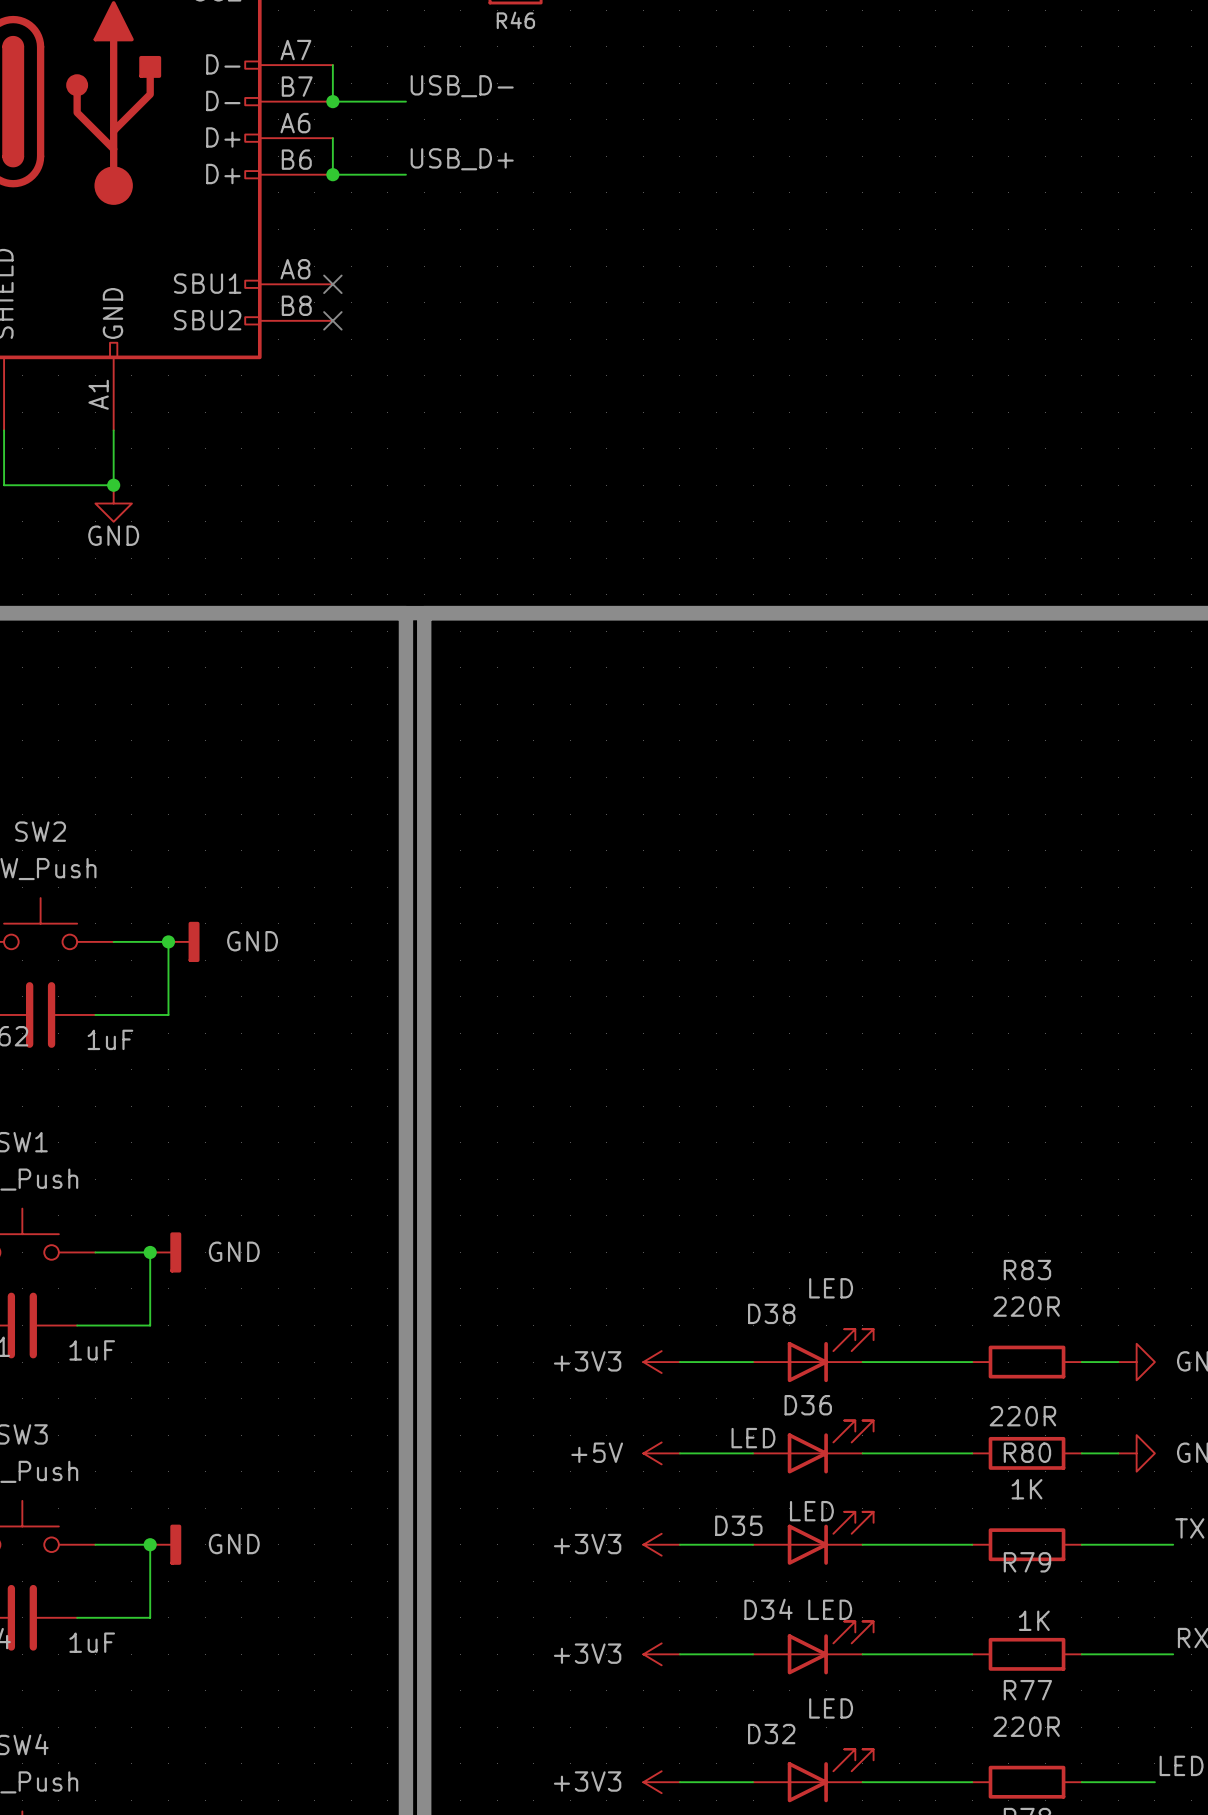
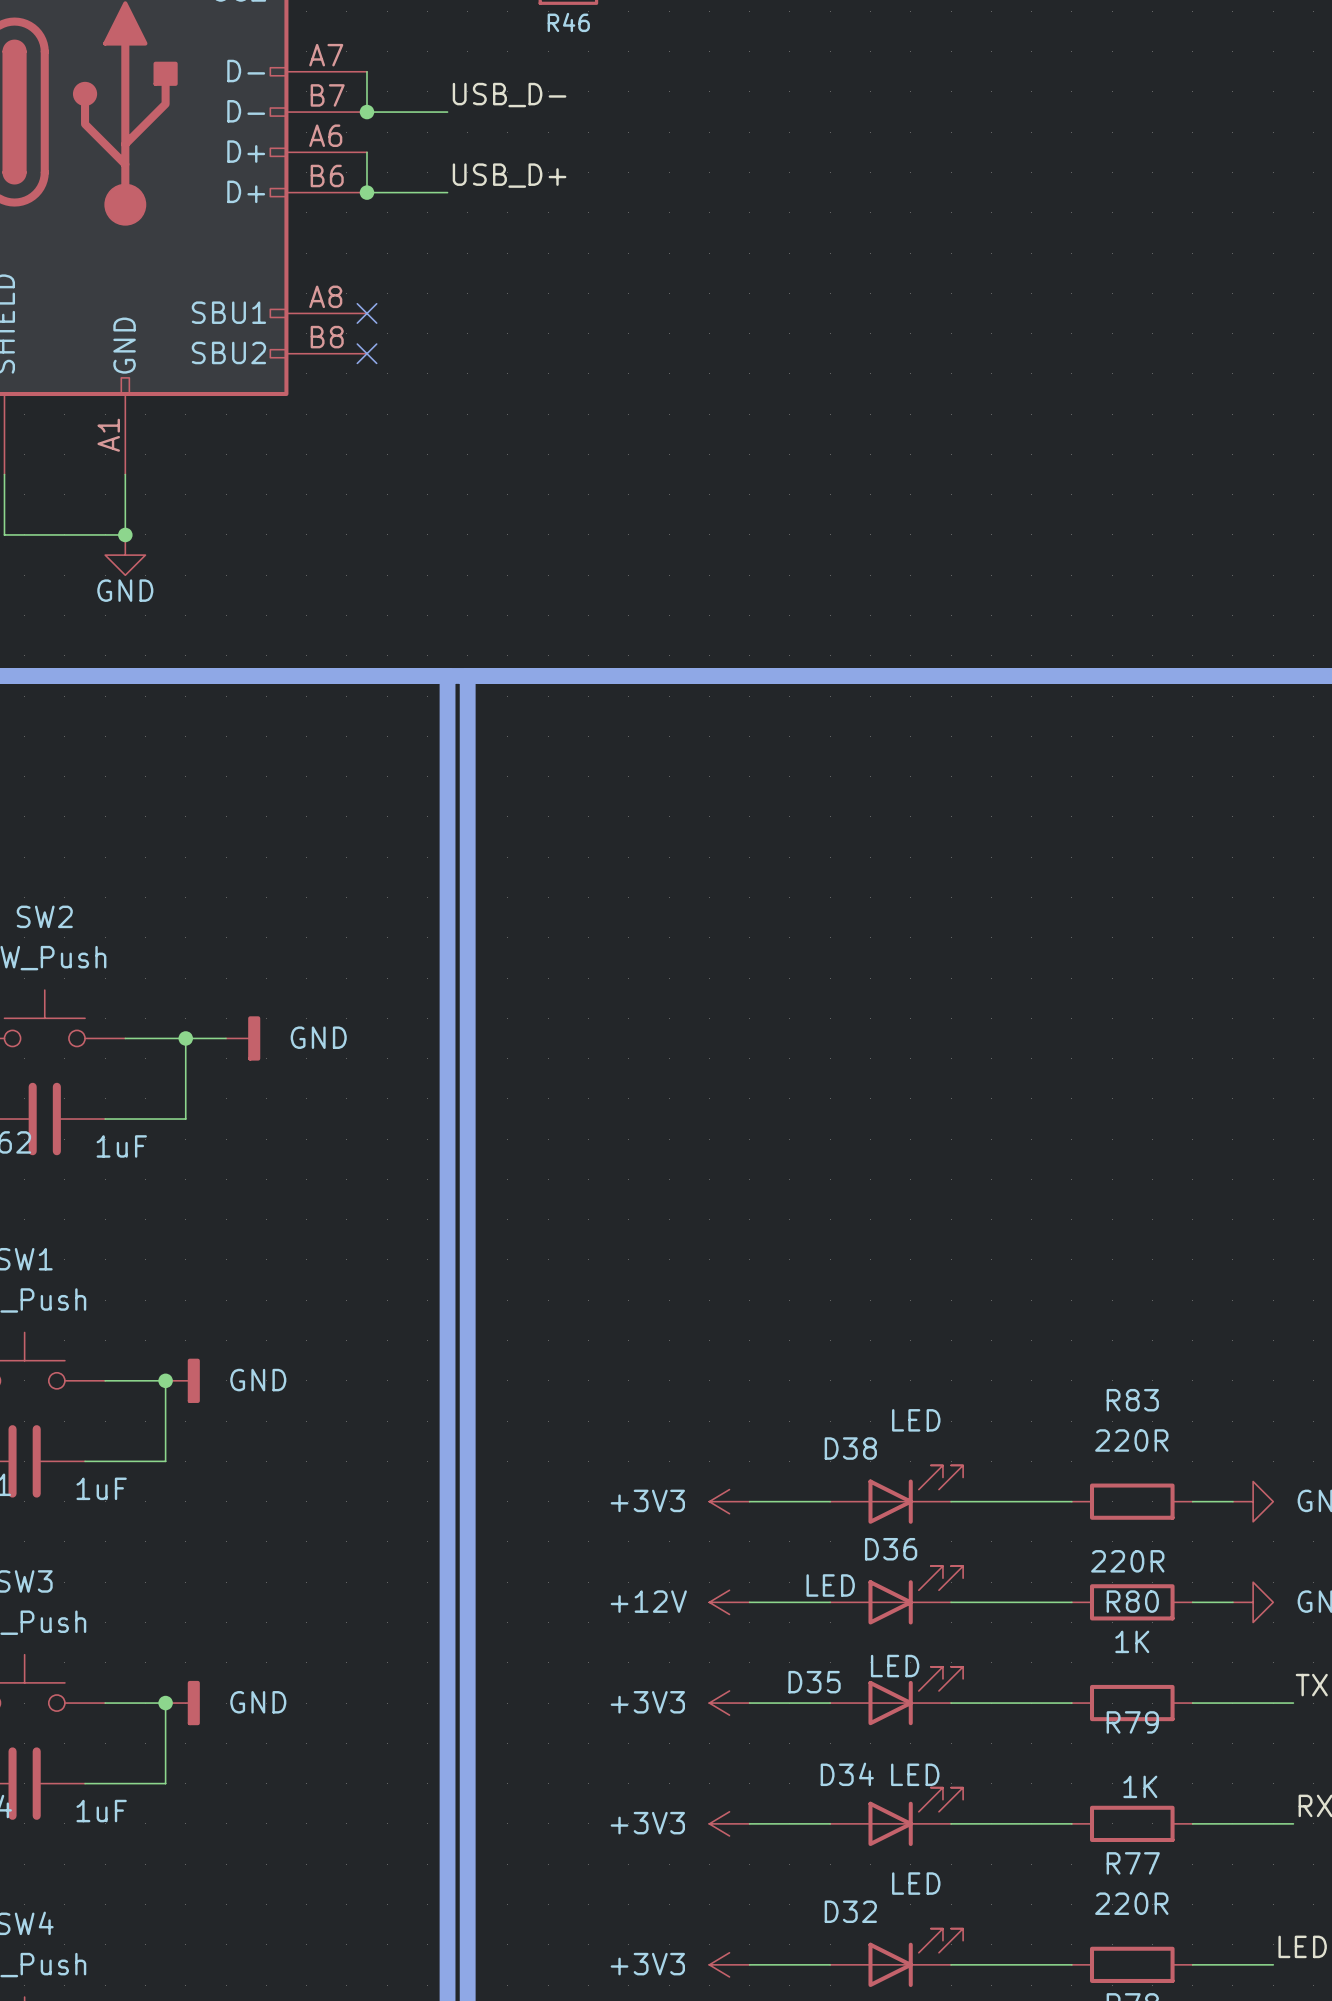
power symbol position: GND (184, 941) -> GND (243, 1038)
power symbol: +5V (661, 1453) -> +12V (729, 1602)

